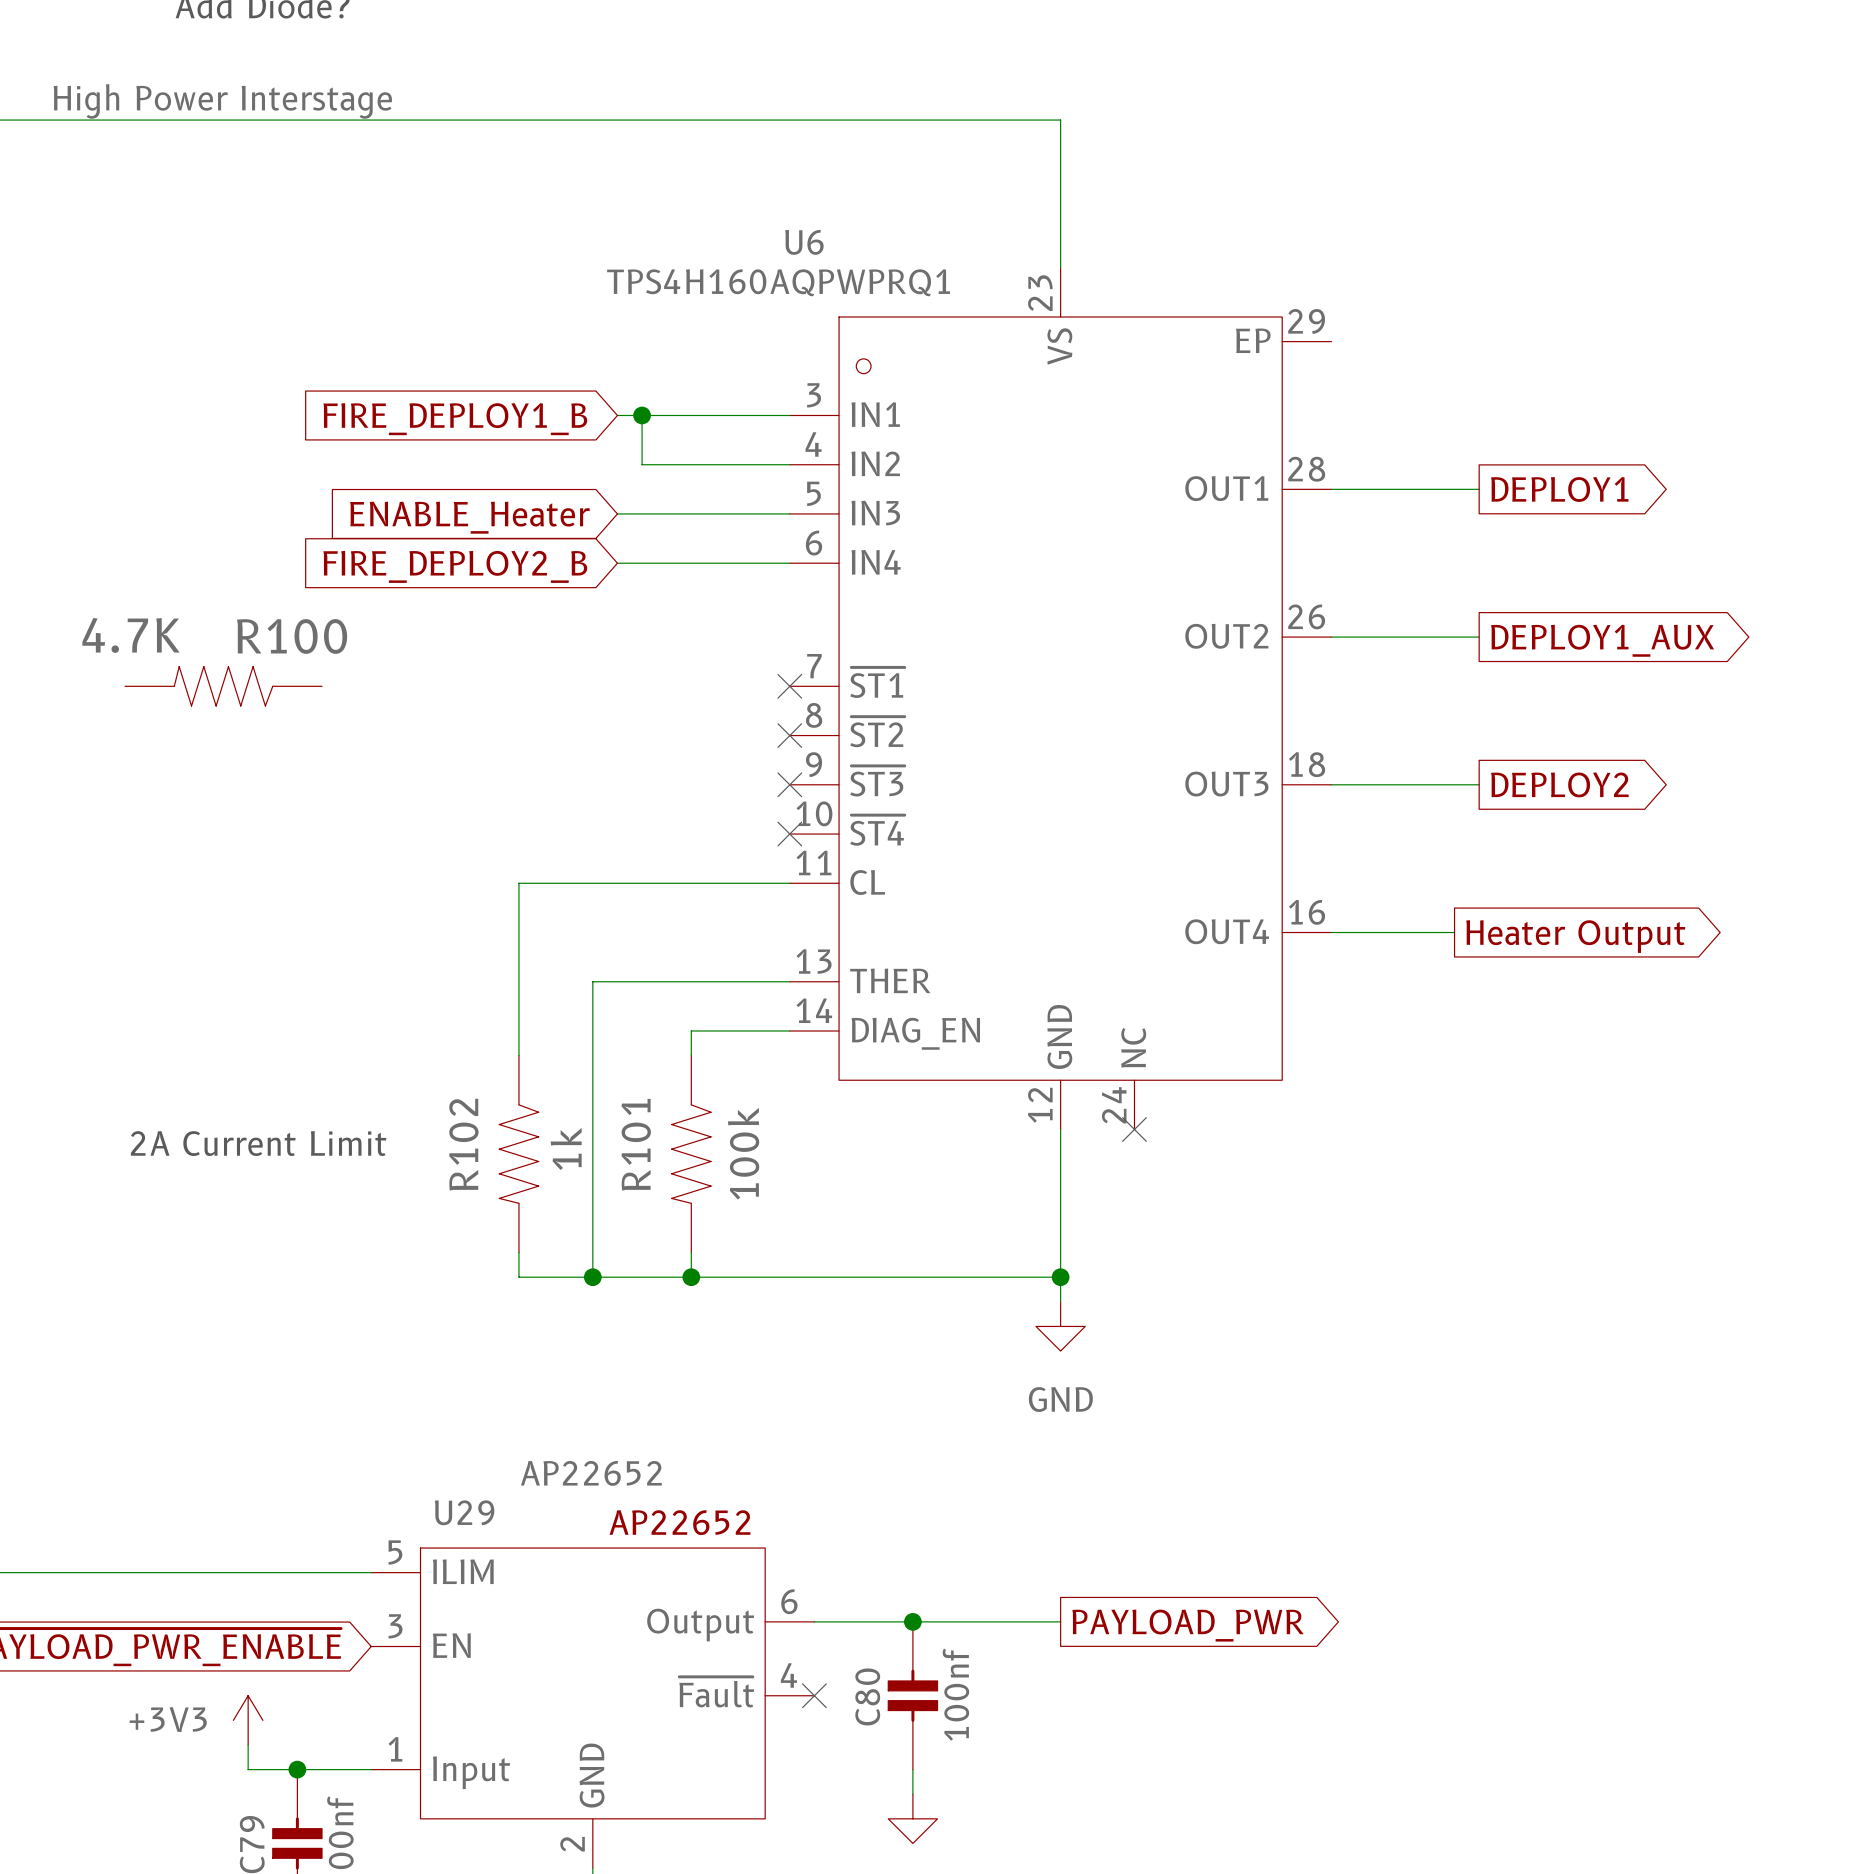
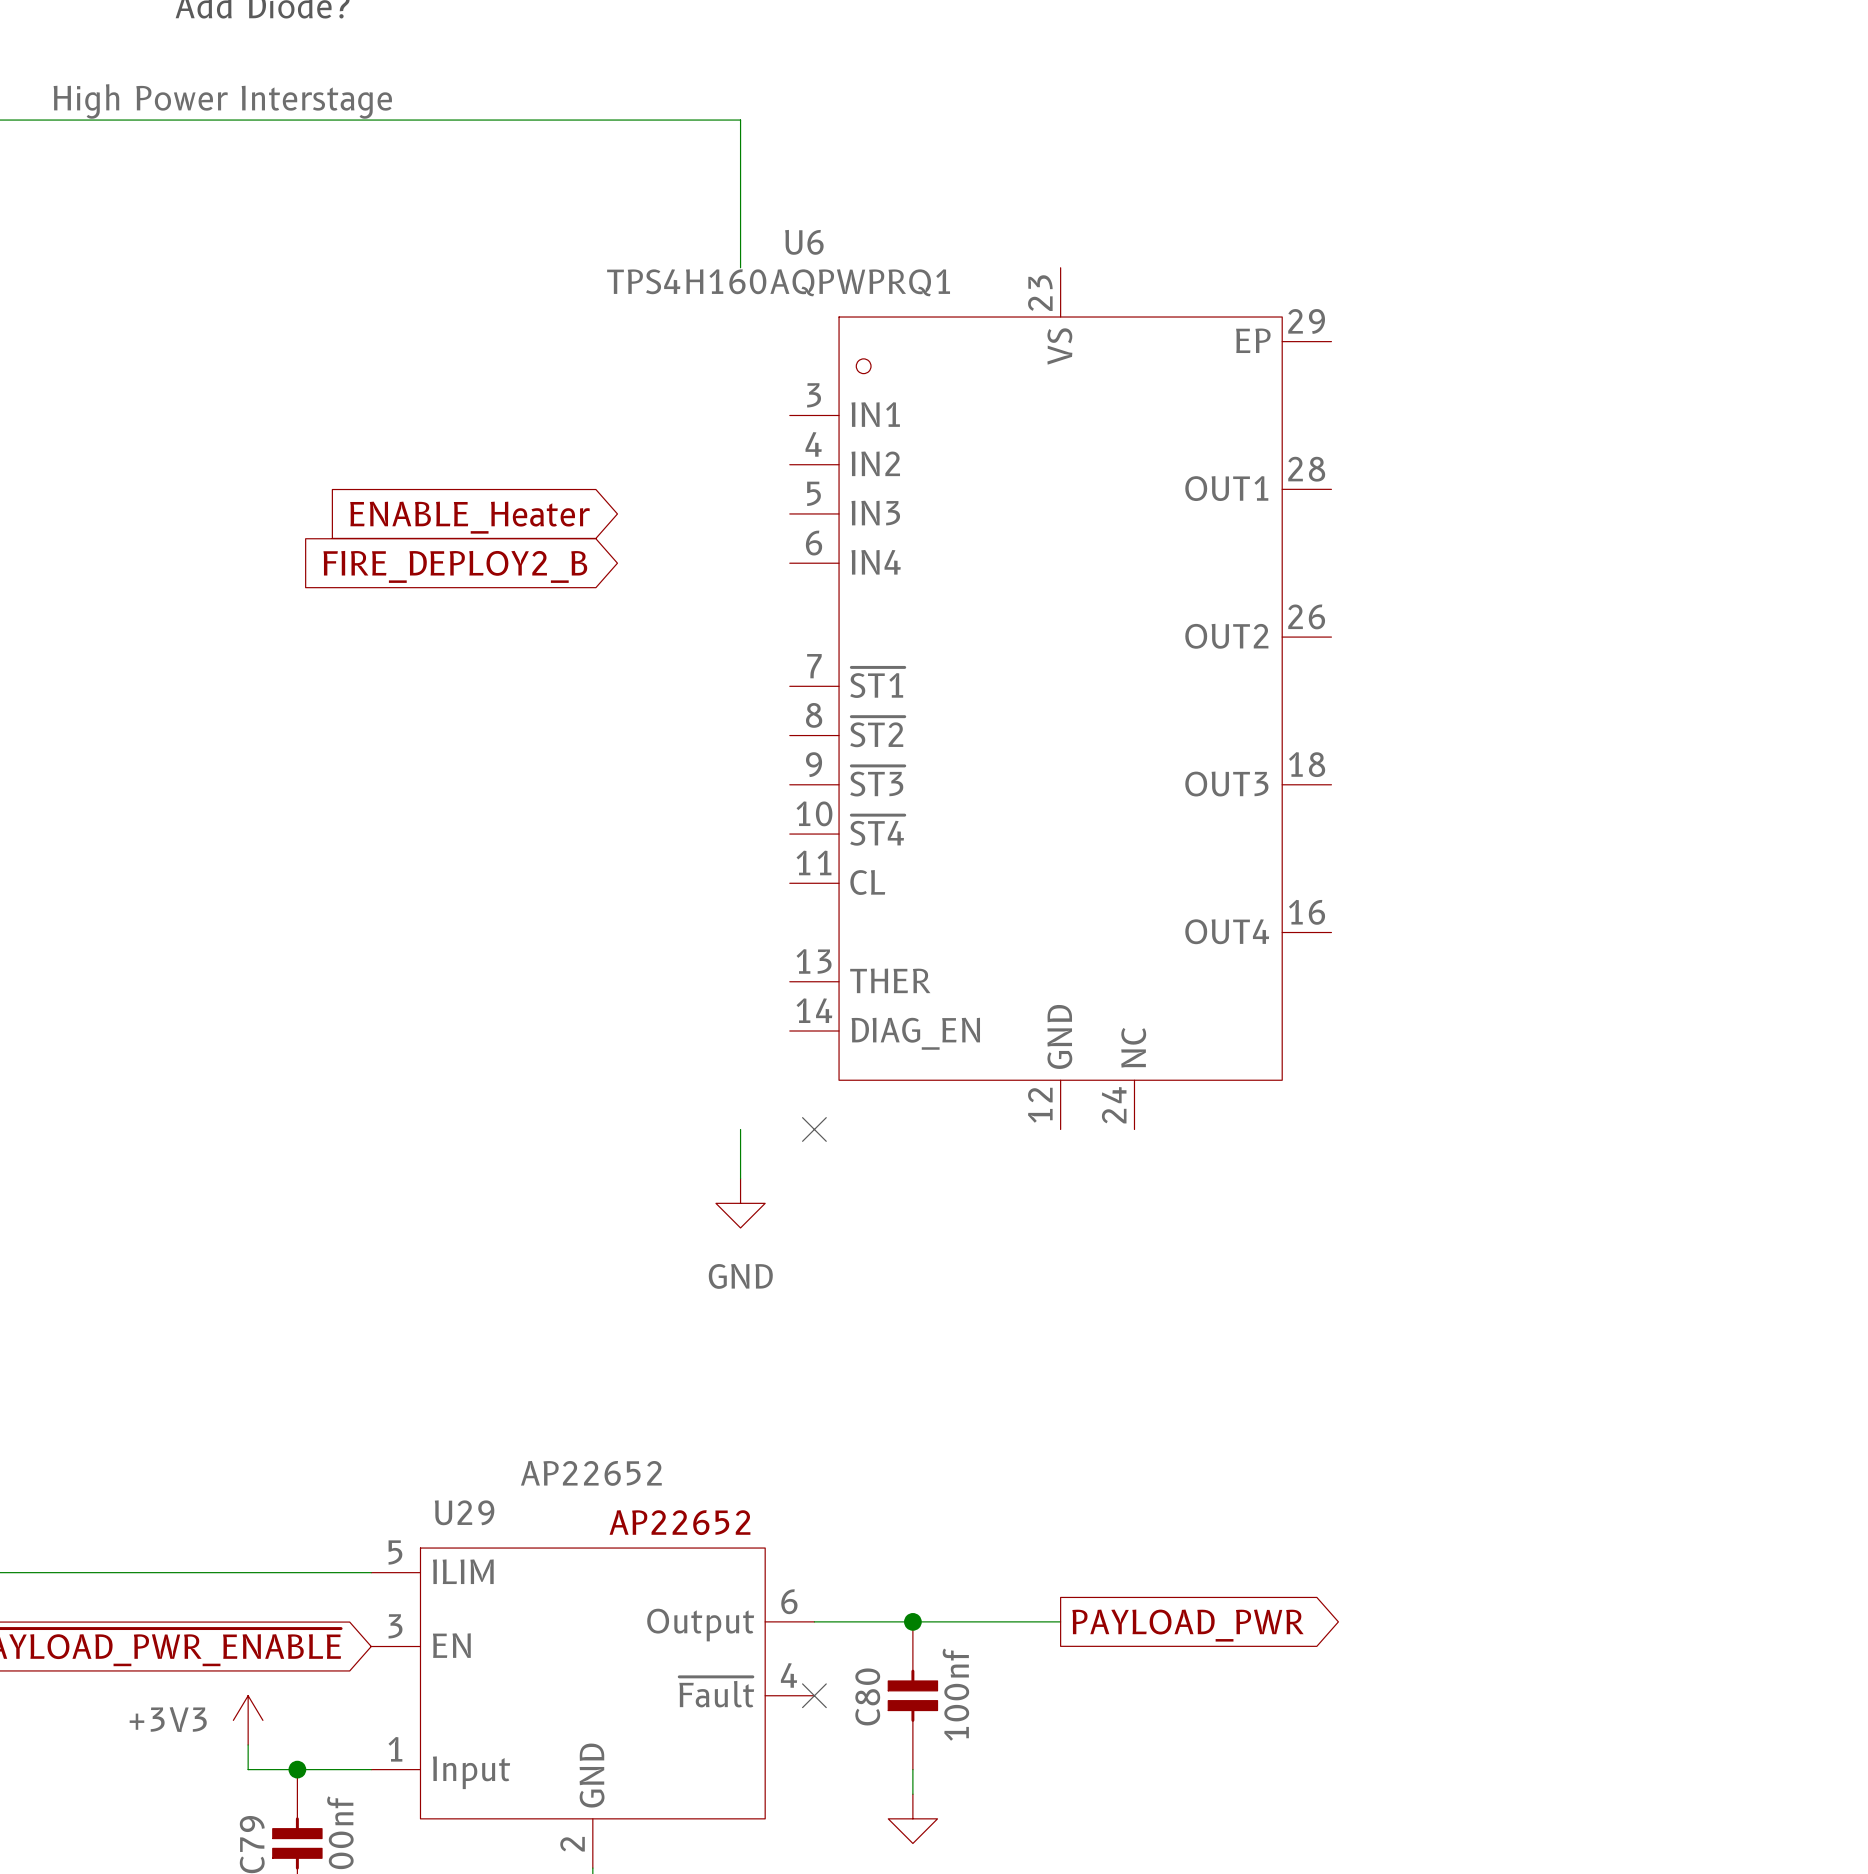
wire: (740, 120) (1060, 120) (1060, 267) -> (740, 120) (740, 267)
wire: (617, 415) (789, 415) -> none
wire: (642, 415) (642, 464) (789, 464) -> none
junction: (642, 415) -> none
global label: FIRE_DEPLOY1_B (455, 419) -> none
wire: (1331, 489) (1479, 489) -> none
global label: DEPLOY1 (1559, 489) -> none
wire: (617, 513) (789, 513) -> none
wire: (617, 563) (789, 563) -> none
wire: (1331, 637) (1479, 637) -> none
global label: DEPLOY1_AUX (1602, 640) -> none
R100: 4.7K (223, 686) -> none
no-connect mark: (789, 686) -> none
no-connect mark: (789, 735) -> none
no-connect mark: (789, 784) -> none
wire: (1331, 784) (1479, 784) -> none
global label: DEPLOY2 (1559, 784) -> none
no-connect mark: (789, 834) -> none
wire: (789, 883) (518, 883) (518, 1055) -> none
wire: (1331, 932) (1454, 932) -> none
global label: Heater Output (1575, 936) -> none
wire: (789, 981) (592, 981) (592, 1277) -> none
wire: (789, 1031) (691, 1031) (691, 1055) -> none
wire: none -> (740, 1129) (740, 1178)
no-connect mark: none -> (814, 1129)
wire: (1060, 1129) (1060, 1301) -> none
no-connect mark: (1134, 1129) -> none
text: 2A Current Limit (258, 1143) -> none
R102: 1k (518, 1154) -> none
R101: 100k (691, 1154) -> none
wire: (518, 1252) (518, 1277) (1060, 1277) -> none
wire: (691, 1252) (691, 1277) -> none
junction: (592, 1277) -> none
junction: (691, 1277) -> none
junction: (1060, 1277) -> none
power symbol position: GND (1060, 1326) -> GND (740, 1203)

